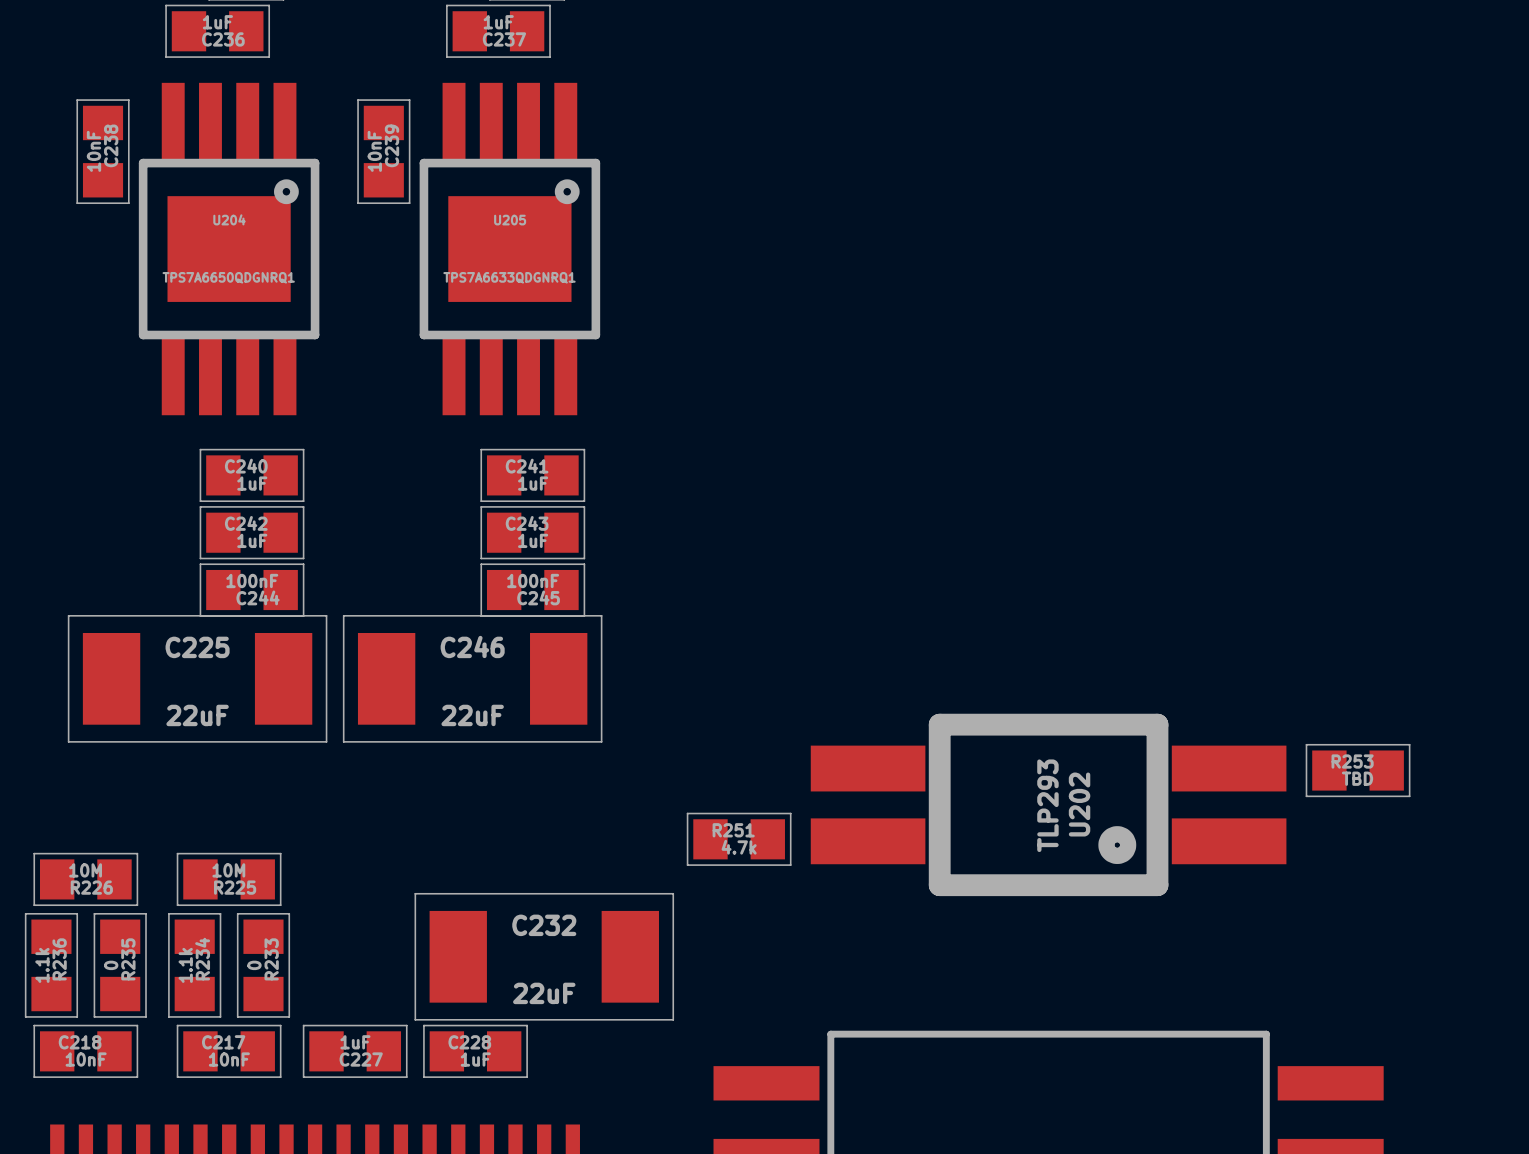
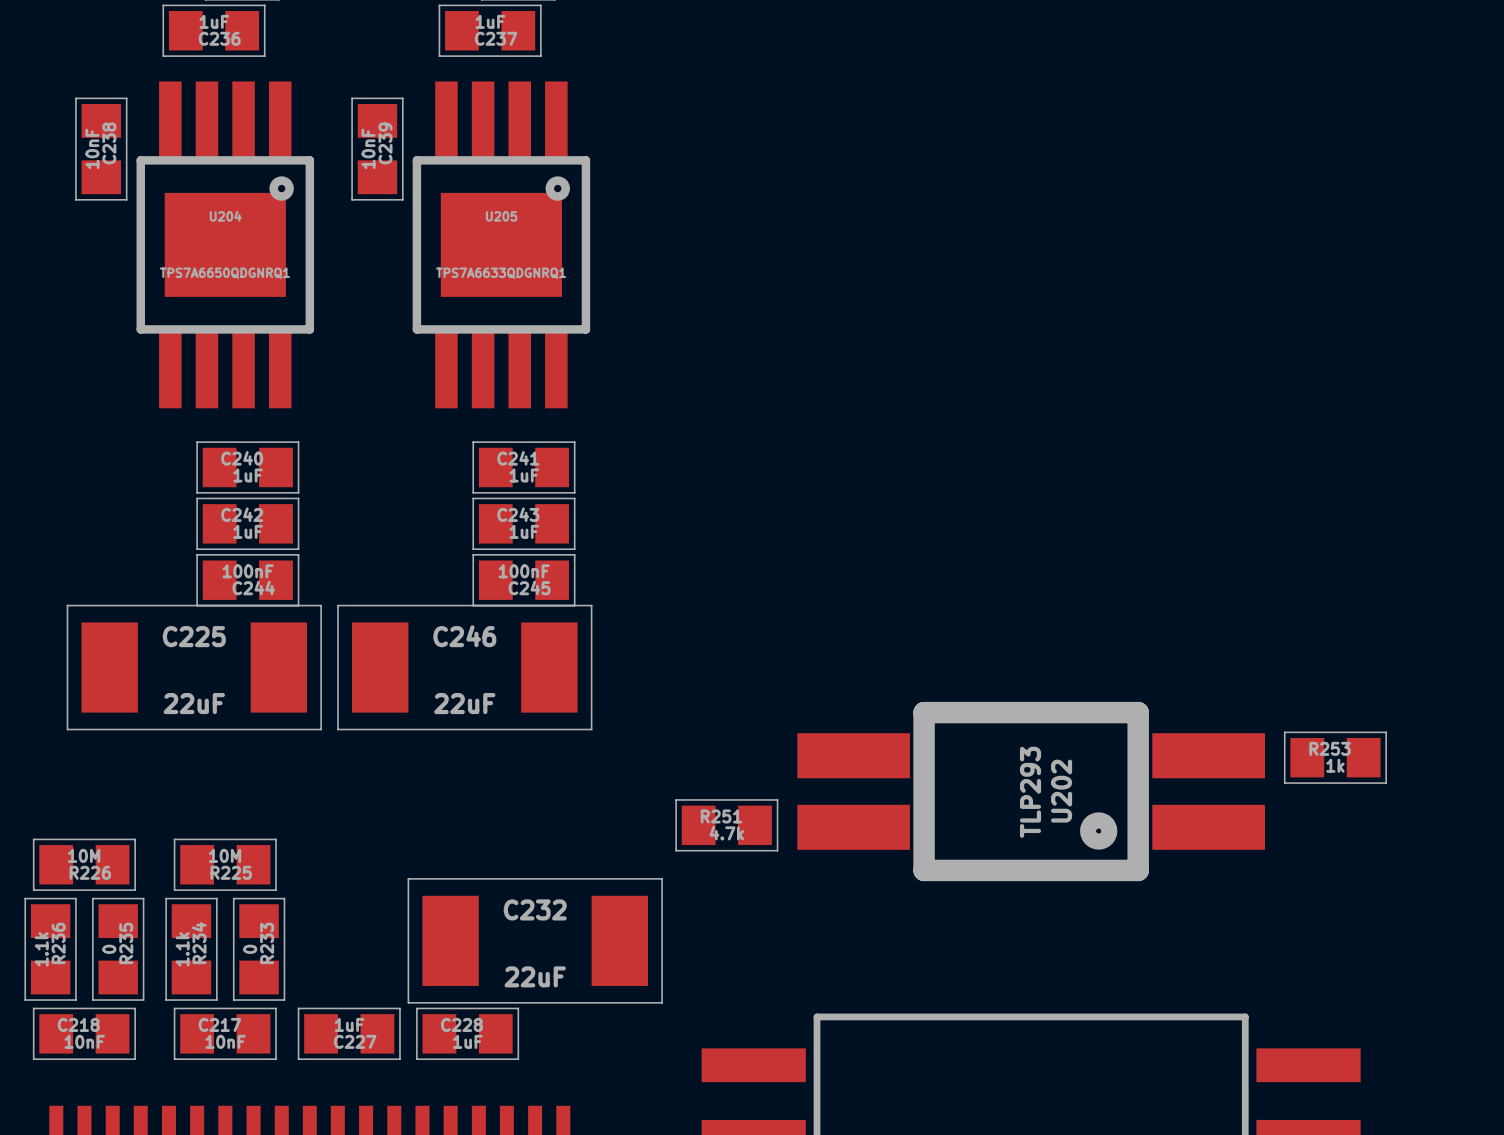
R253 value: TBD (1357, 778) -> 1k (1335, 765)

